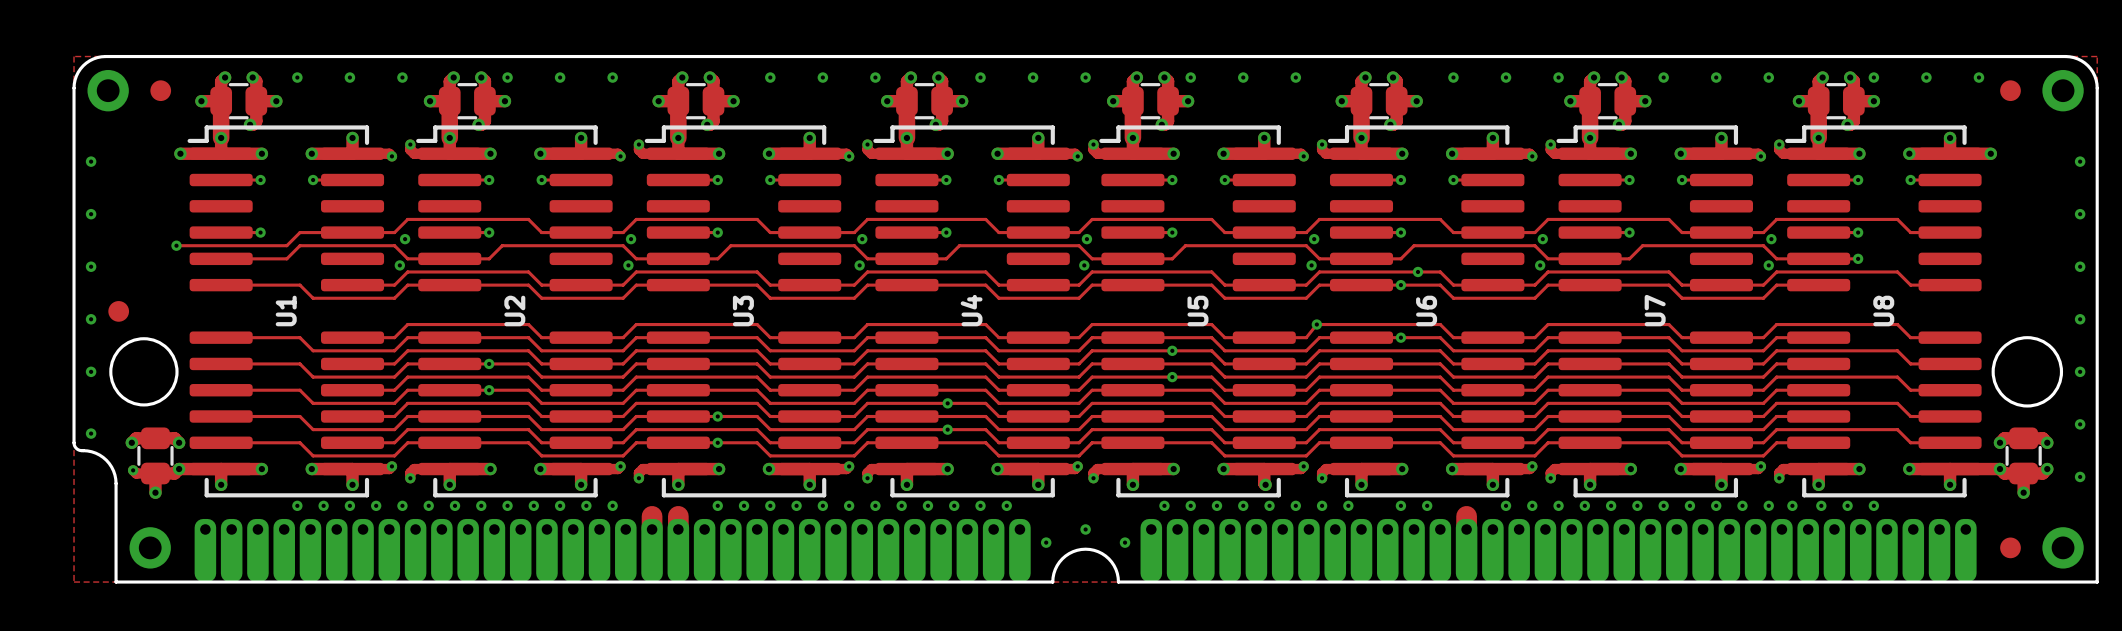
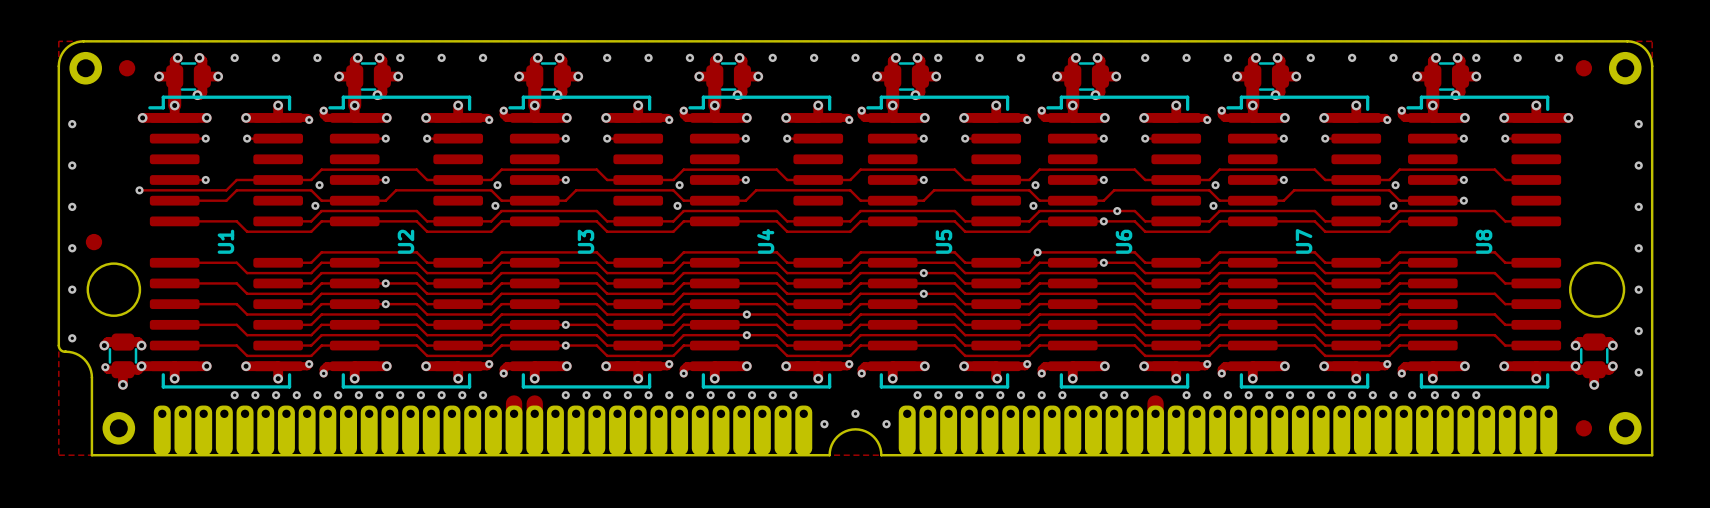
via: (1086, 239) -> none
via: (1084, 265) -> none

